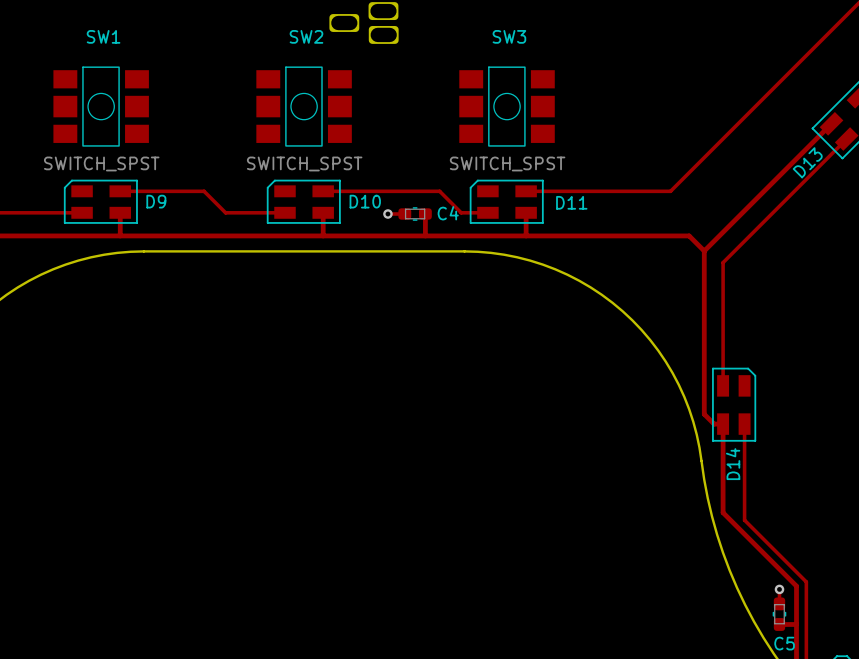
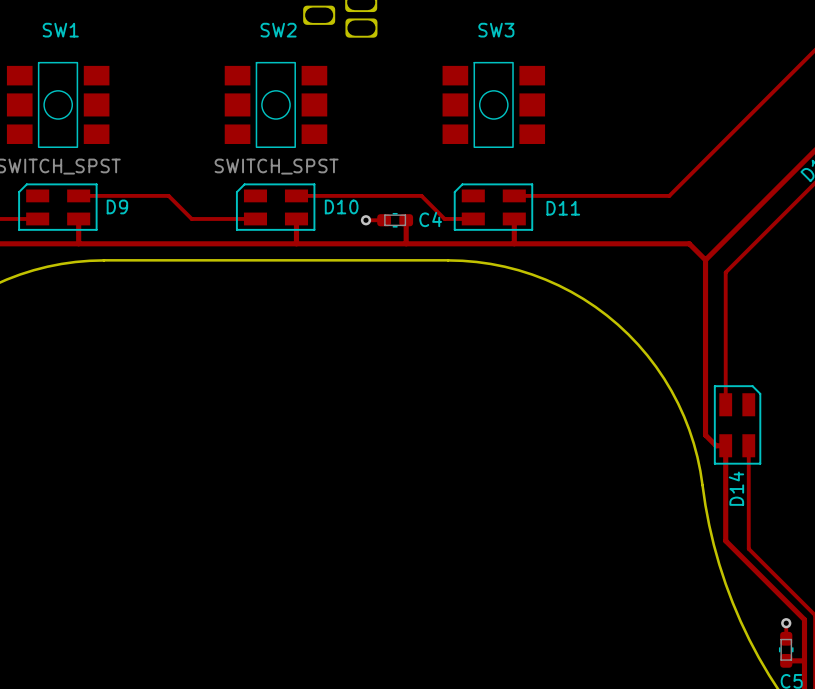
SW3 value: SWITCH_SPST (507, 163) -> none

